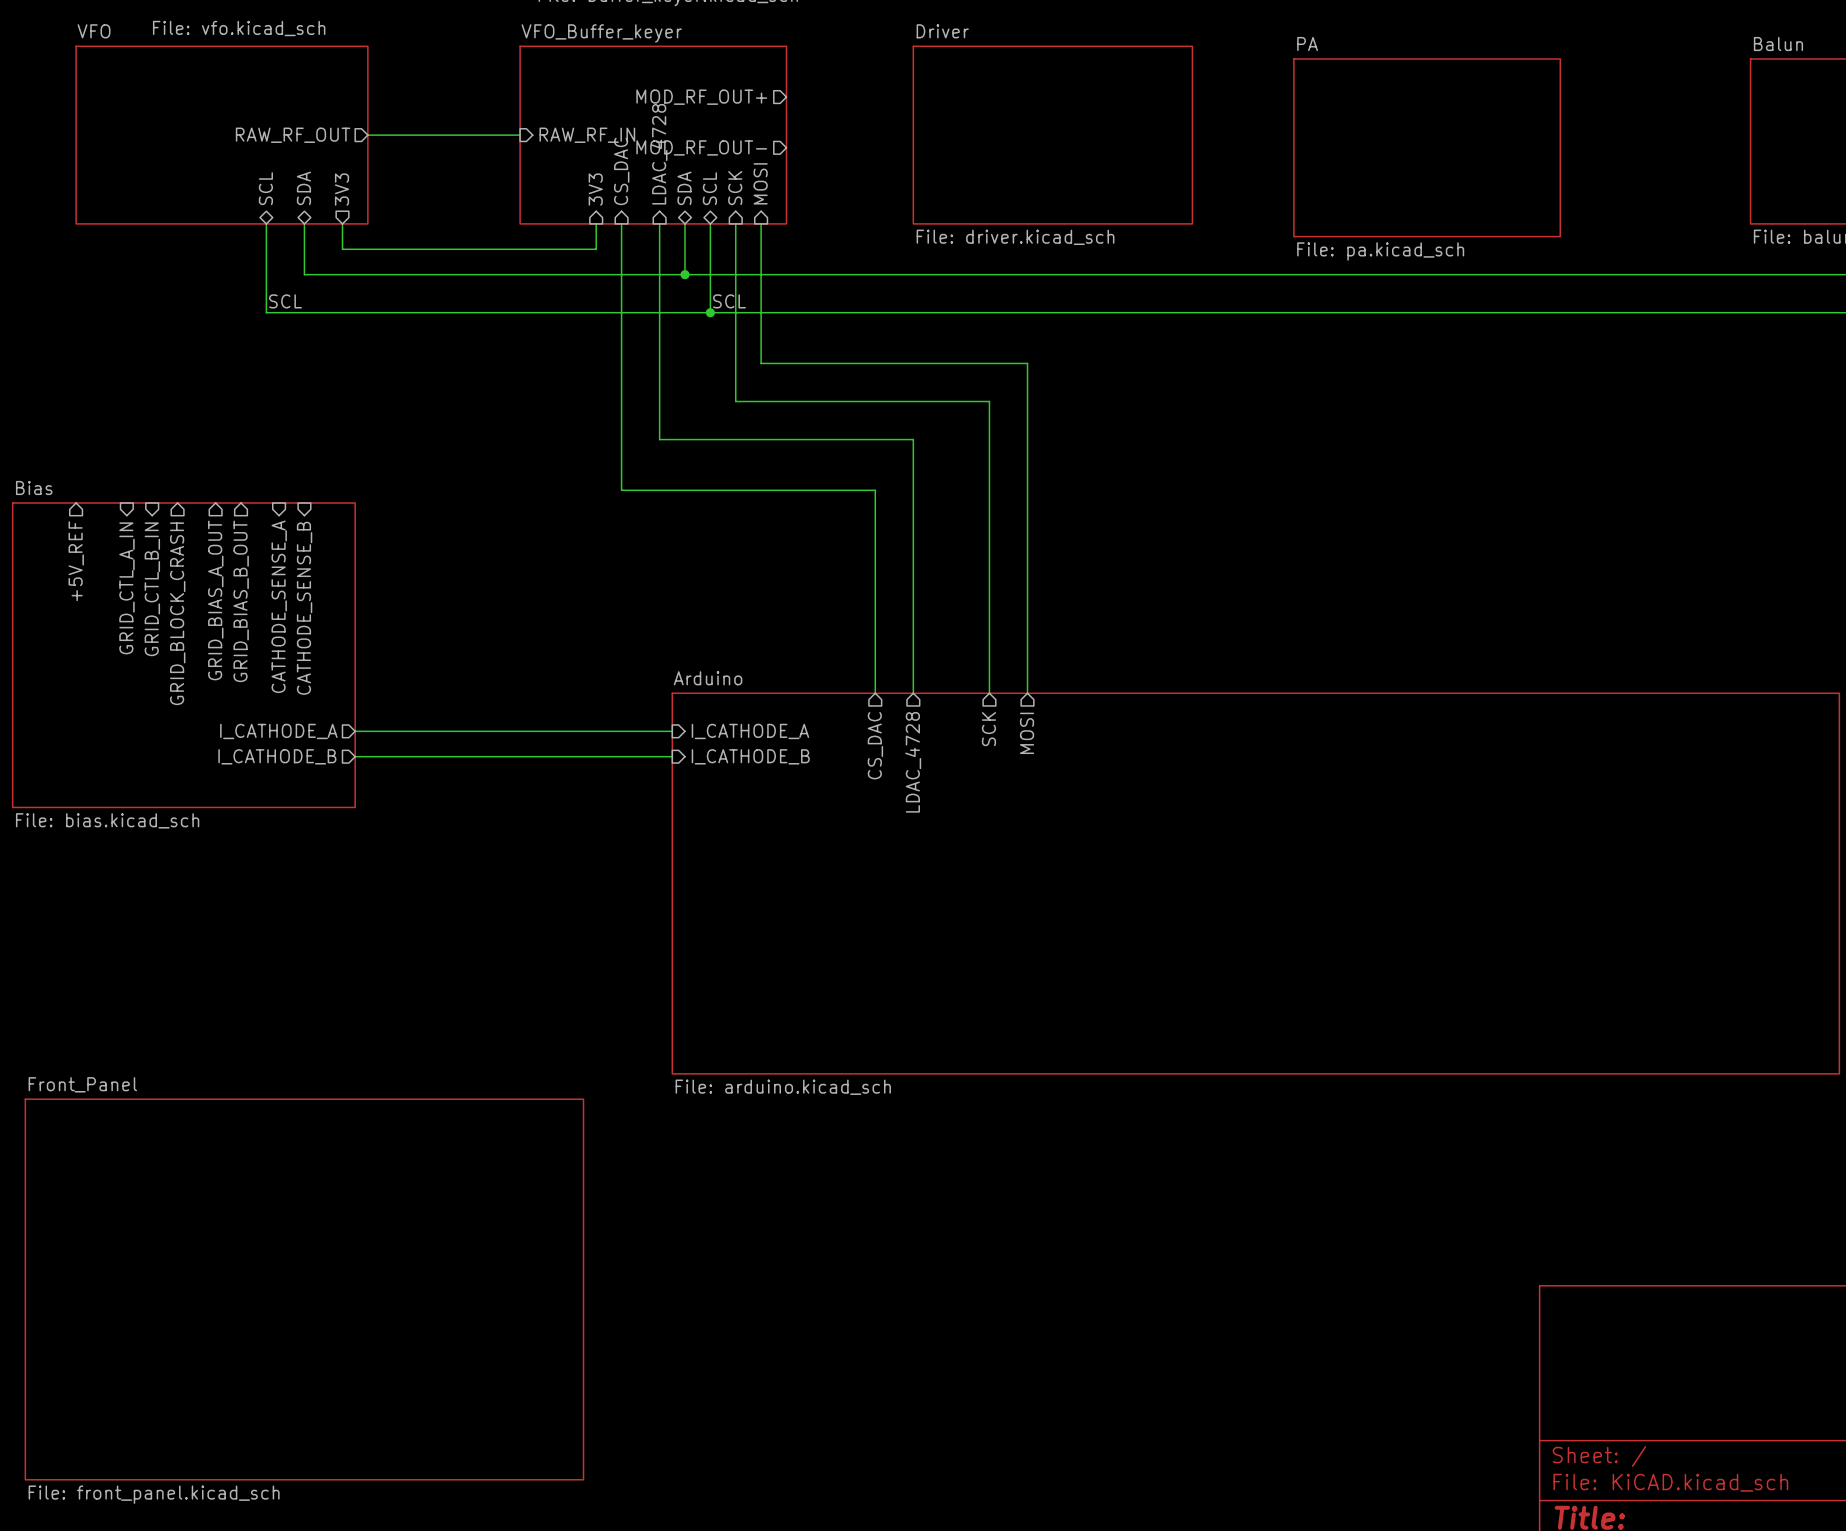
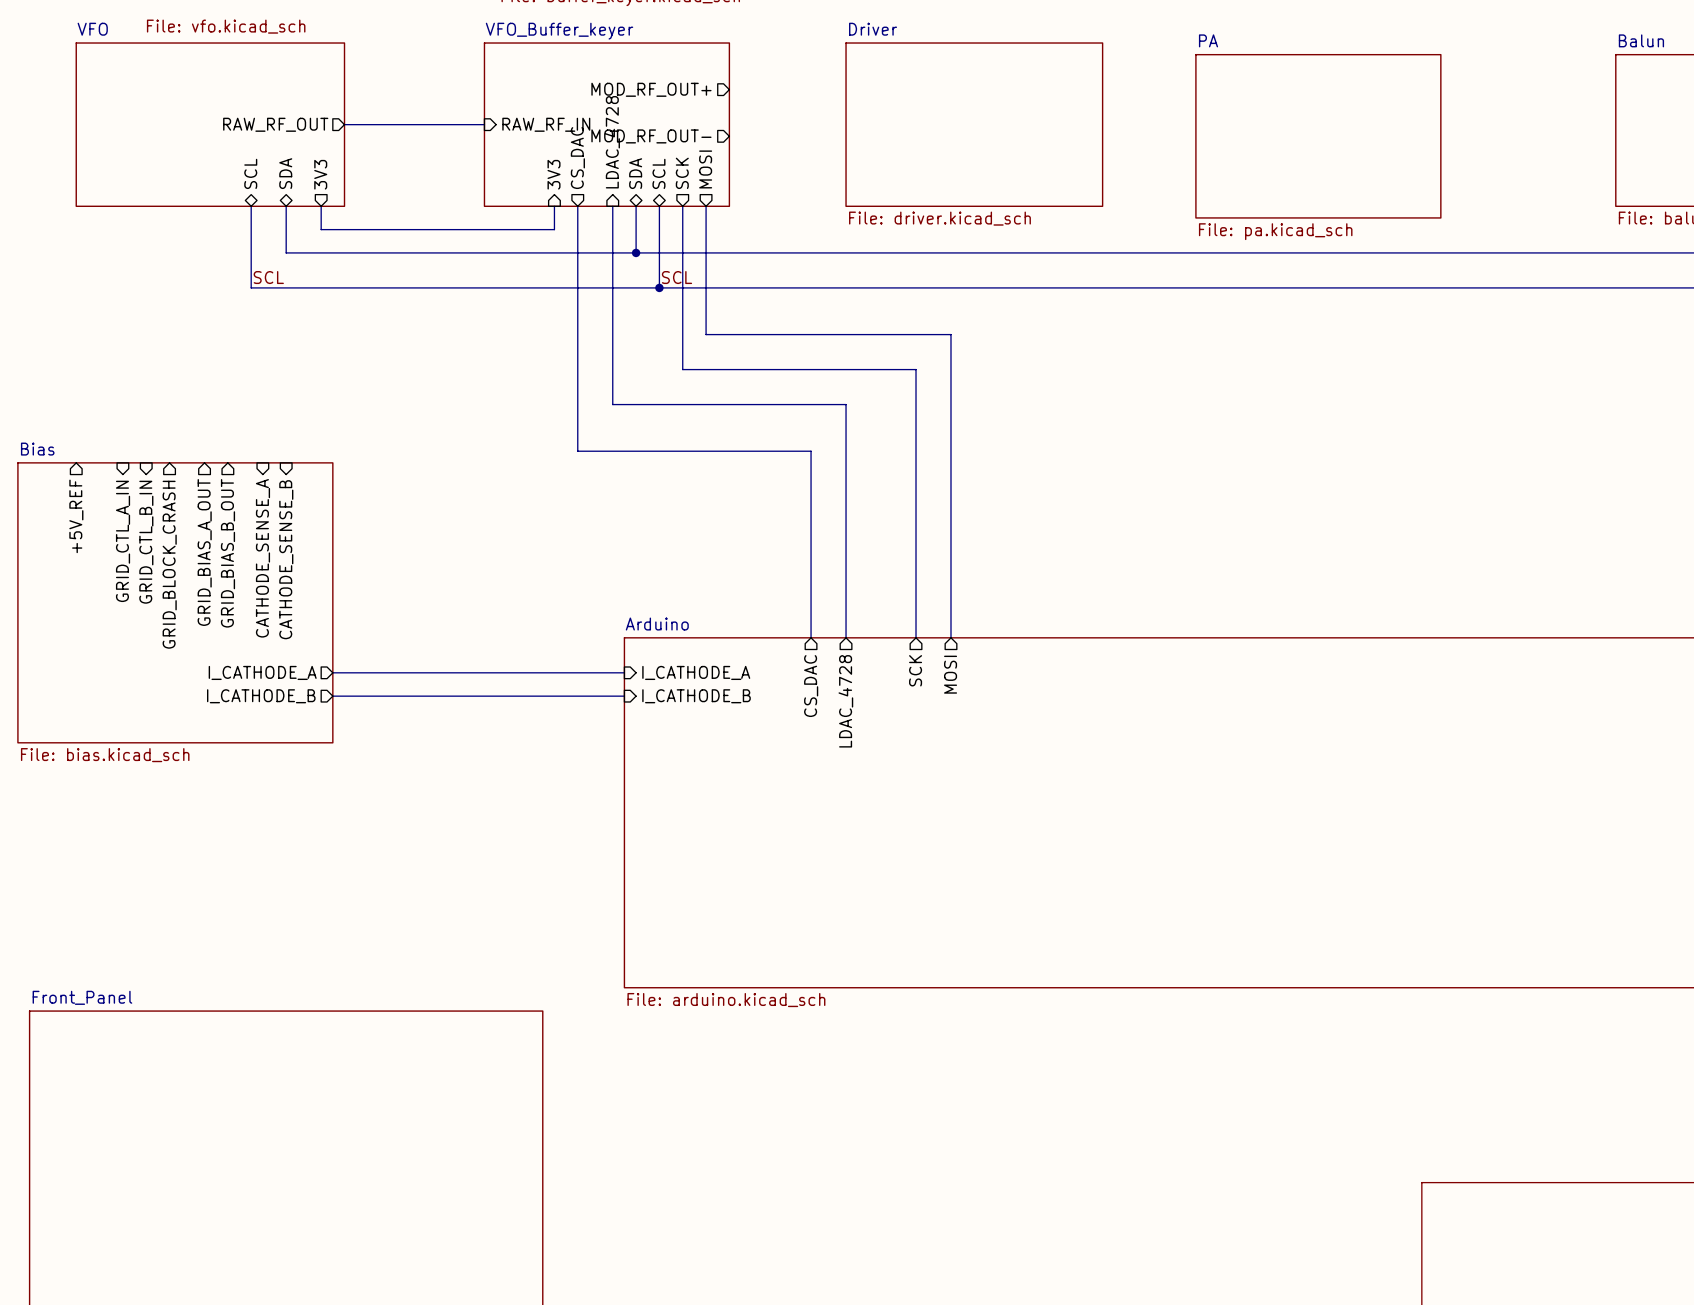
sheet pin shape: input (621, 171) -> output (577, 158)
sheet pin shape: input (760, 183) -> output (705, 169)
sheet pin shape: input (735, 188) -> output (682, 173)

